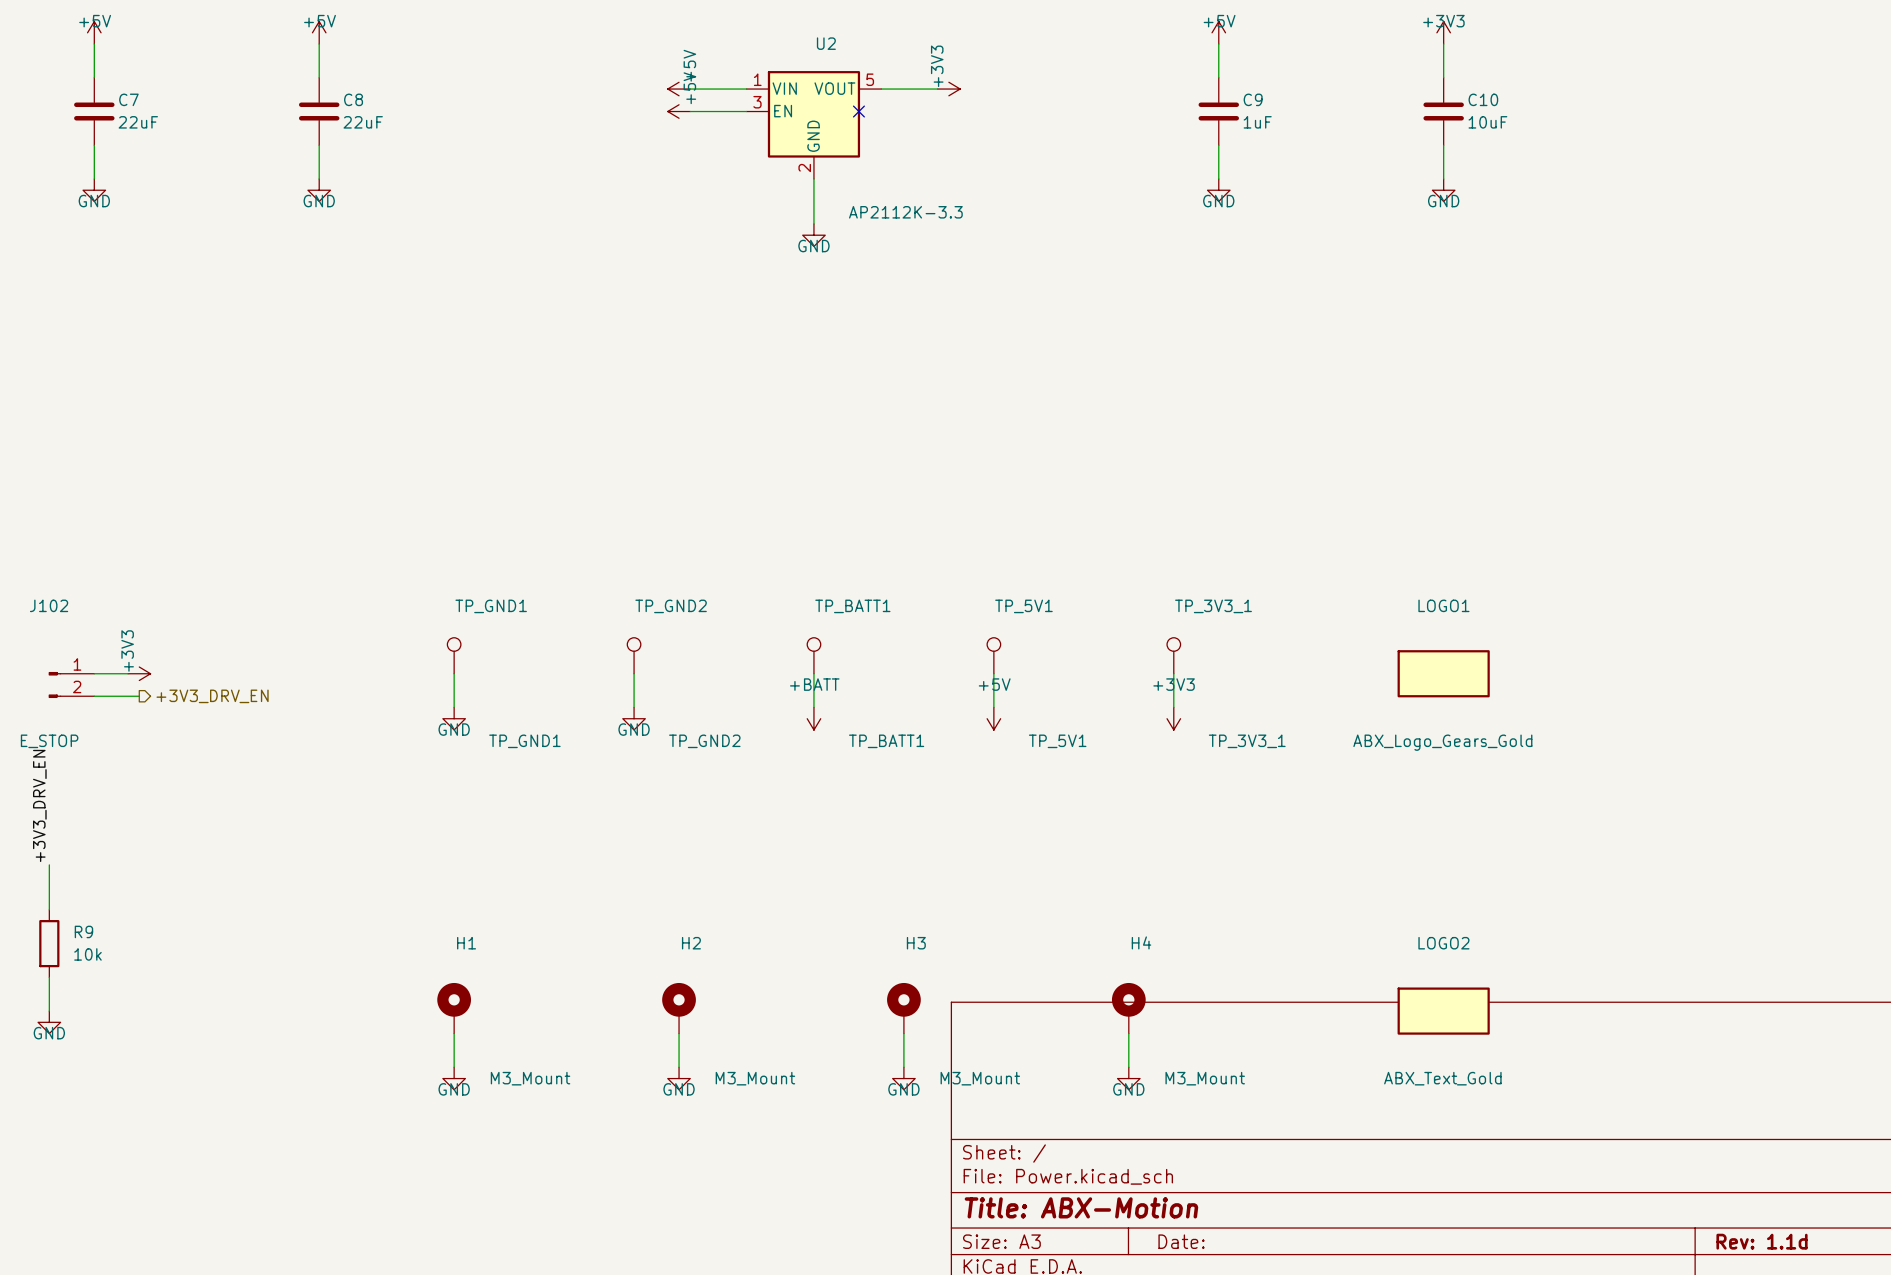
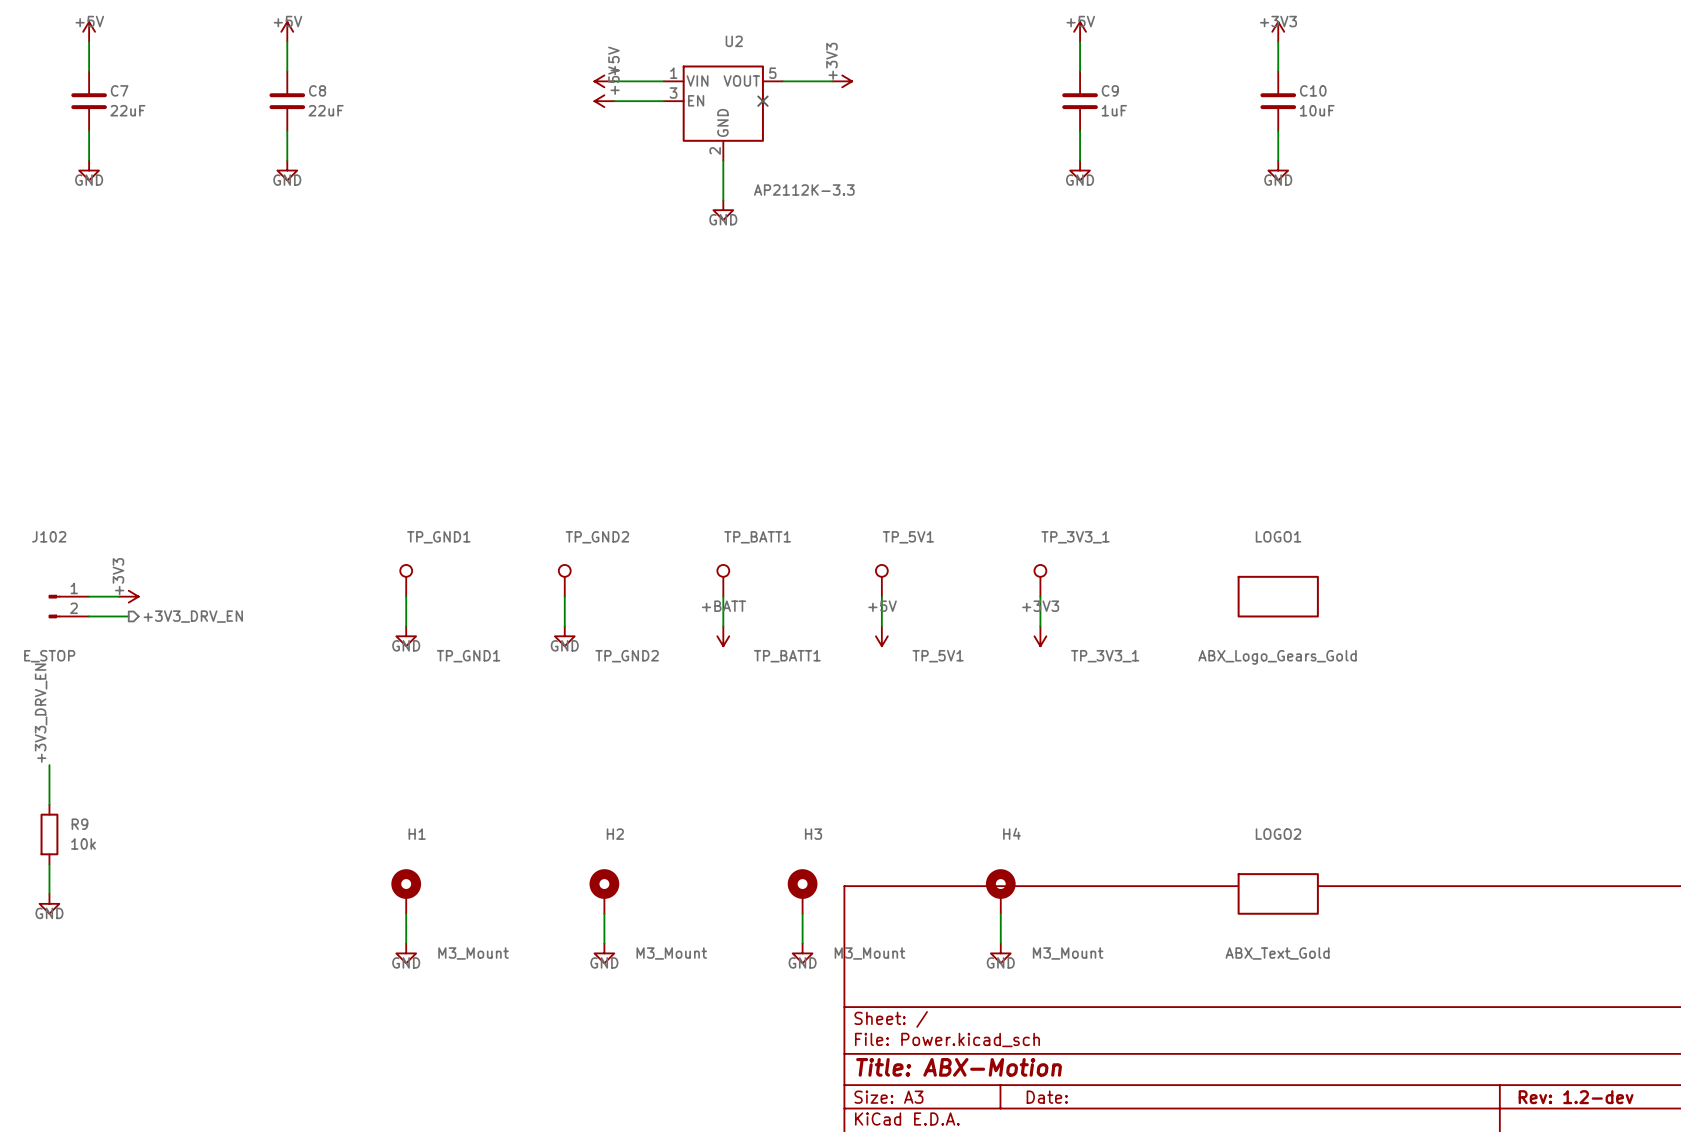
title block: Rev: 1.1d (1762, 1241) -> Rev: 1.2-dev (1576, 1097)

